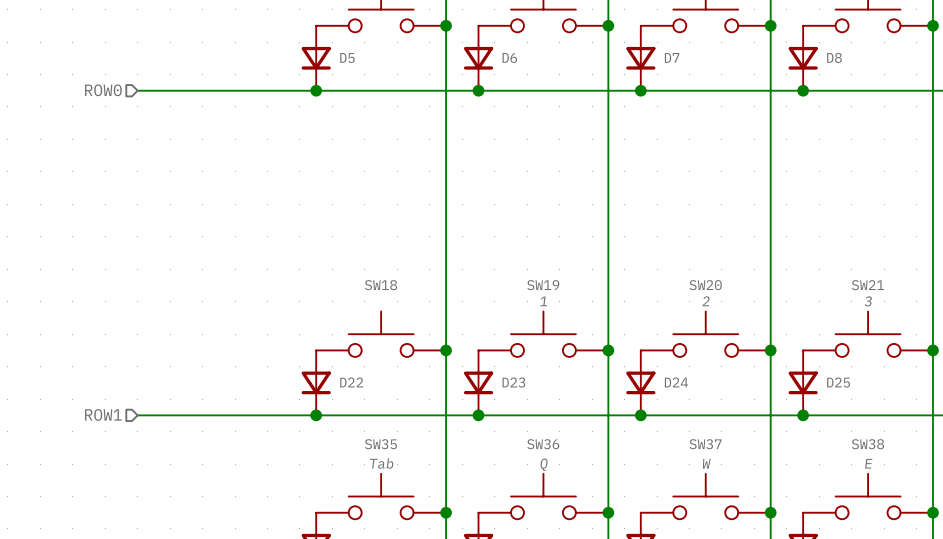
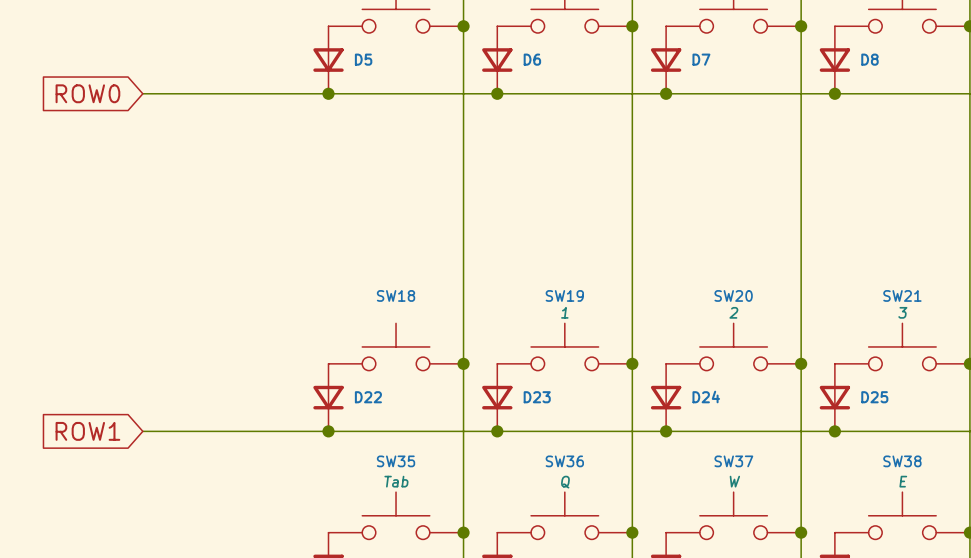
global label: none -> ROW0 (87, 93)
hierarchical label: ROW0 (103, 90) -> none
hierarchical label: ROW1 (103, 414) -> none
global label: none -> ROW1 (87, 431)

